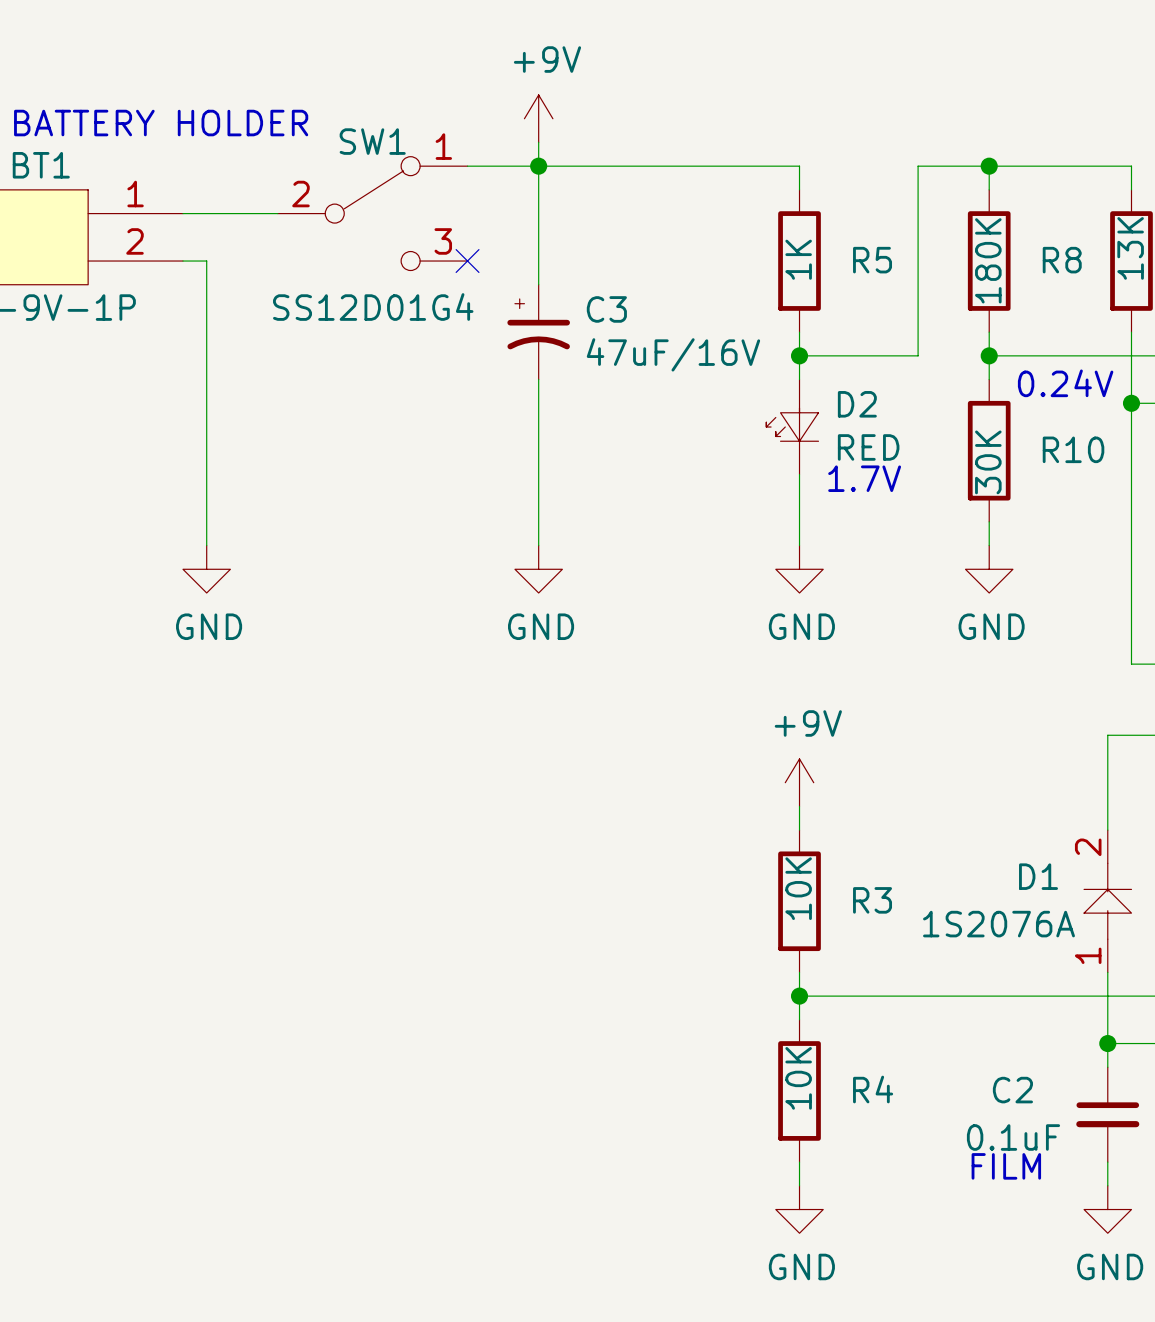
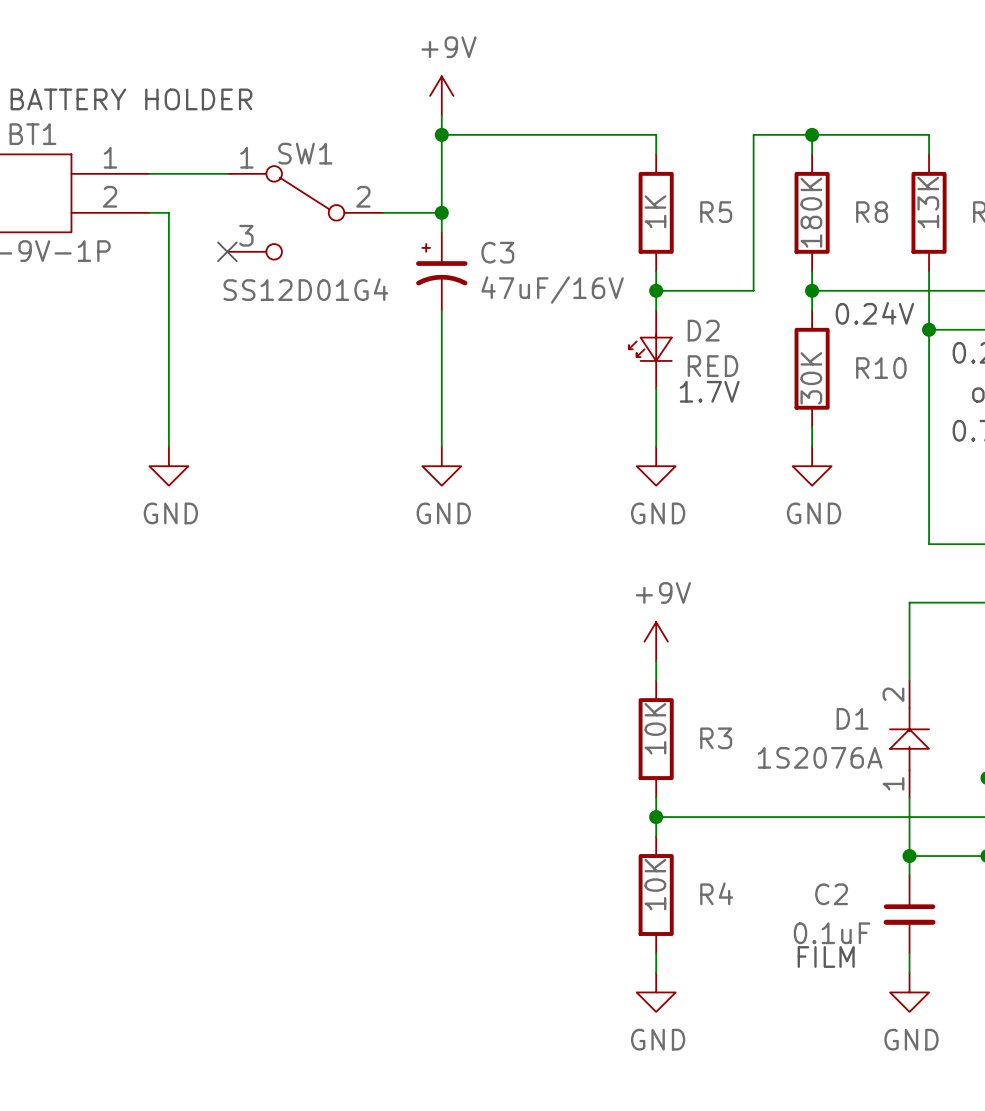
wire: (467, 166) (538, 166) -> (383, 212) (441, 212)
SW1 flip: as is (372, 213) -> left-right (305, 212)
no-connect mark: (467, 261) -> none
junction: none -> (441, 212)
no-connect mark: none -> (227, 251)

